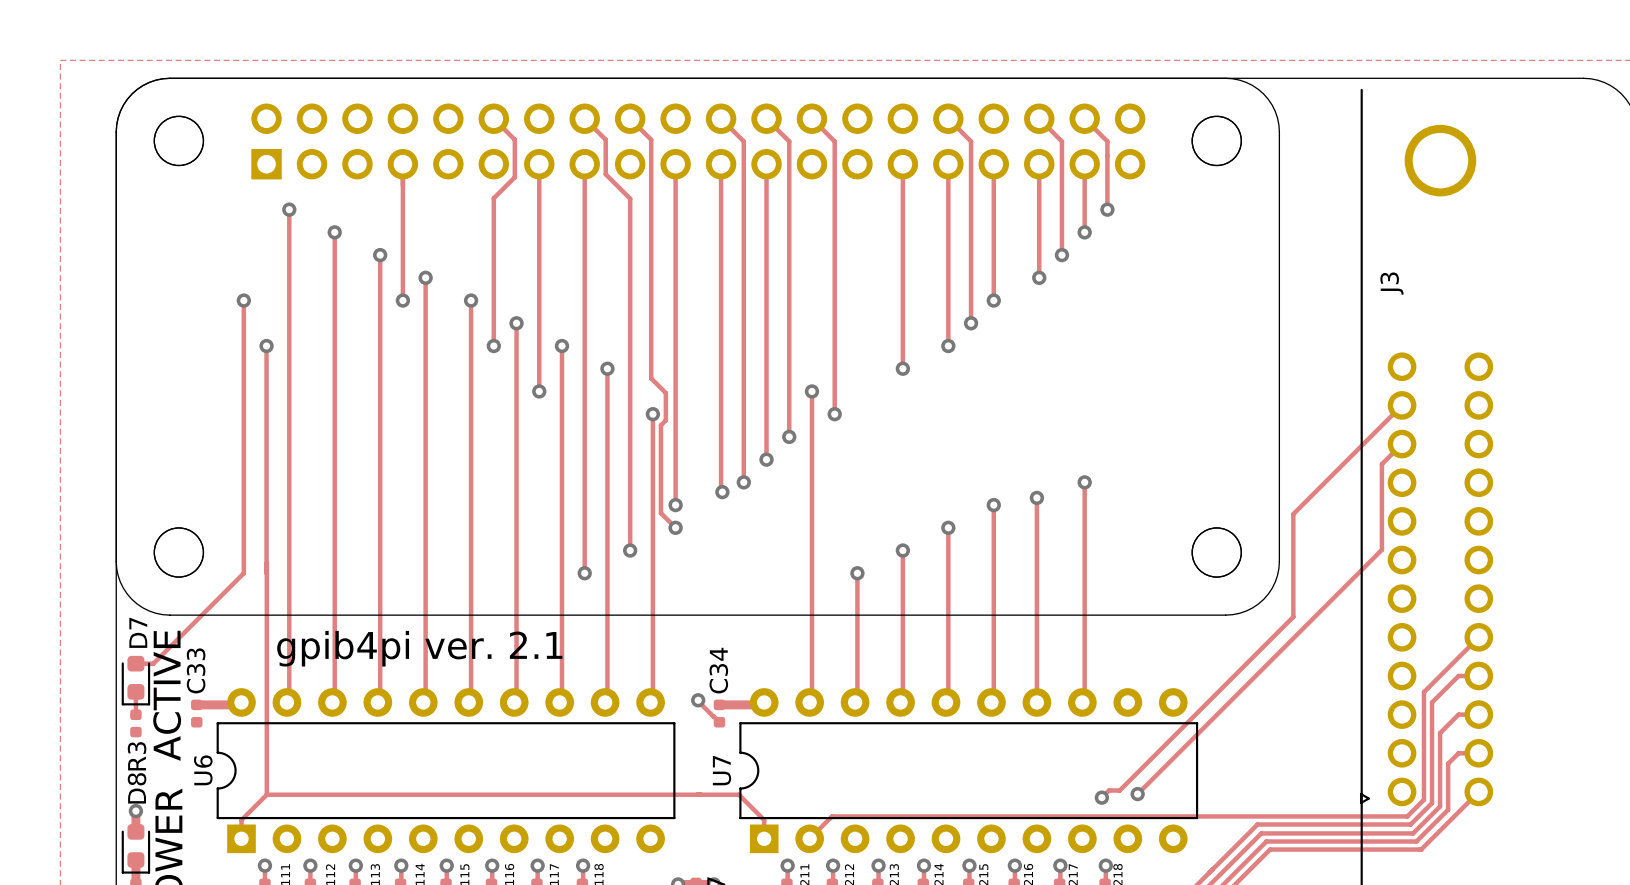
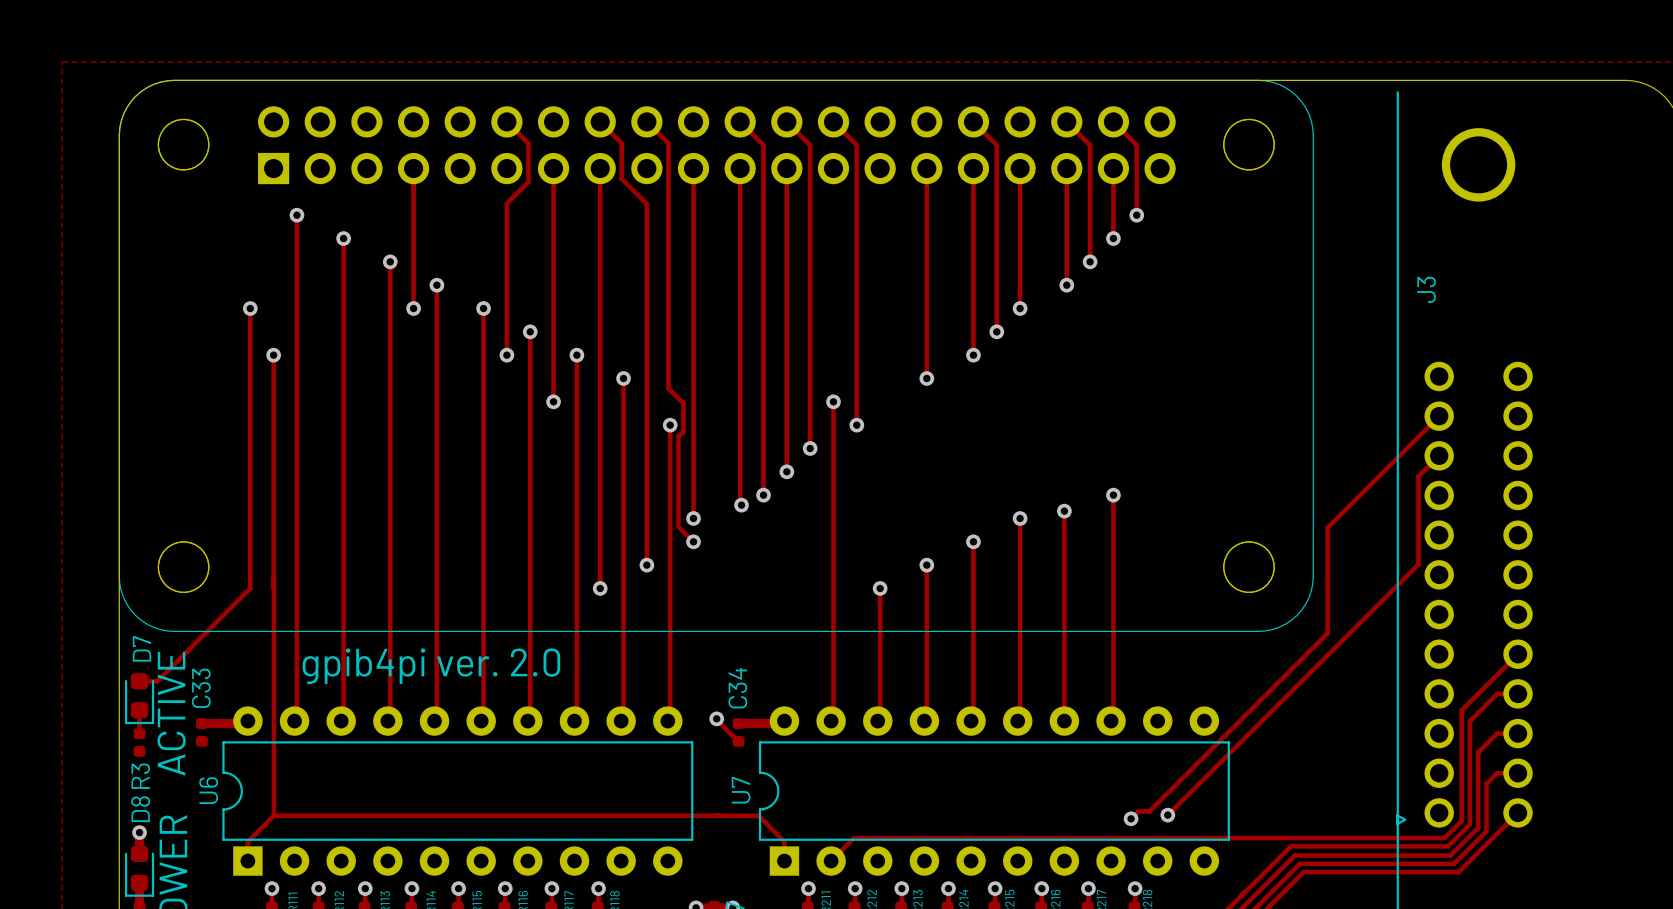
text: gpib4pi ver. 2.1 (419, 648) -> gpib4pi ver. 2.0 (431, 666)

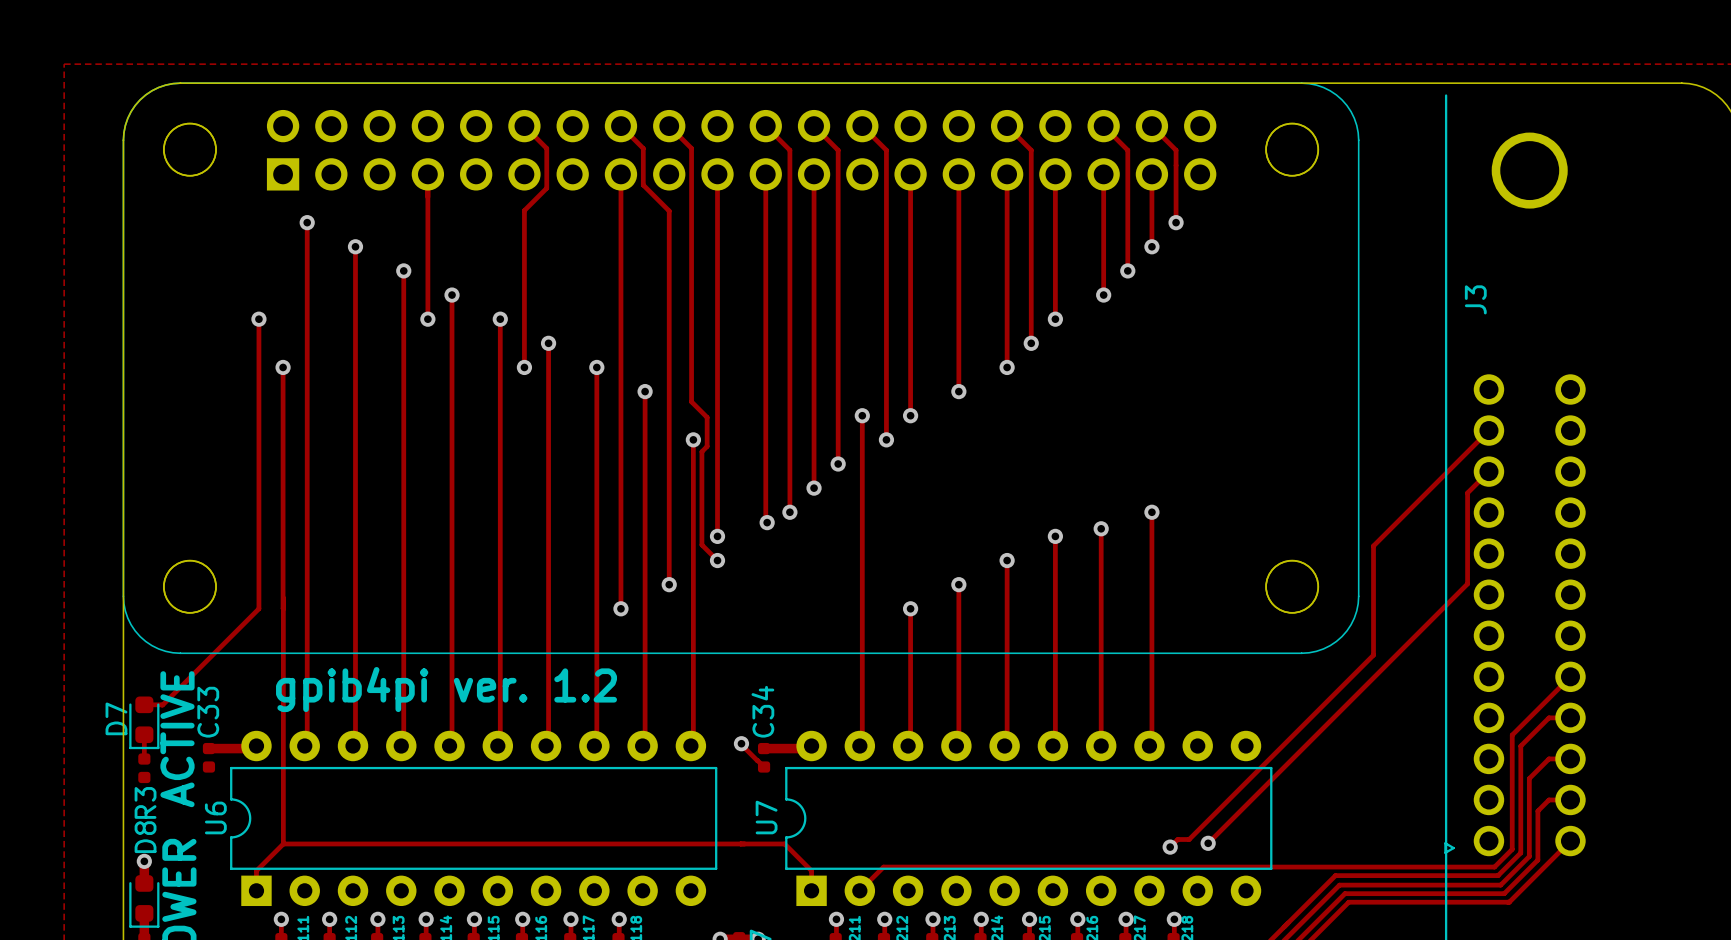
track: (553, 168) (553, 401) -> (910, 174) (910, 415)
via: (553, 401) -> none
via: none -> (910, 415)
D7 name position: D7 (141, 648) -> D7 (116, 718)
text: gpib4pi ver. 2.0 (431, 666) -> gpib4pi ver. 1.2 (446, 689)

